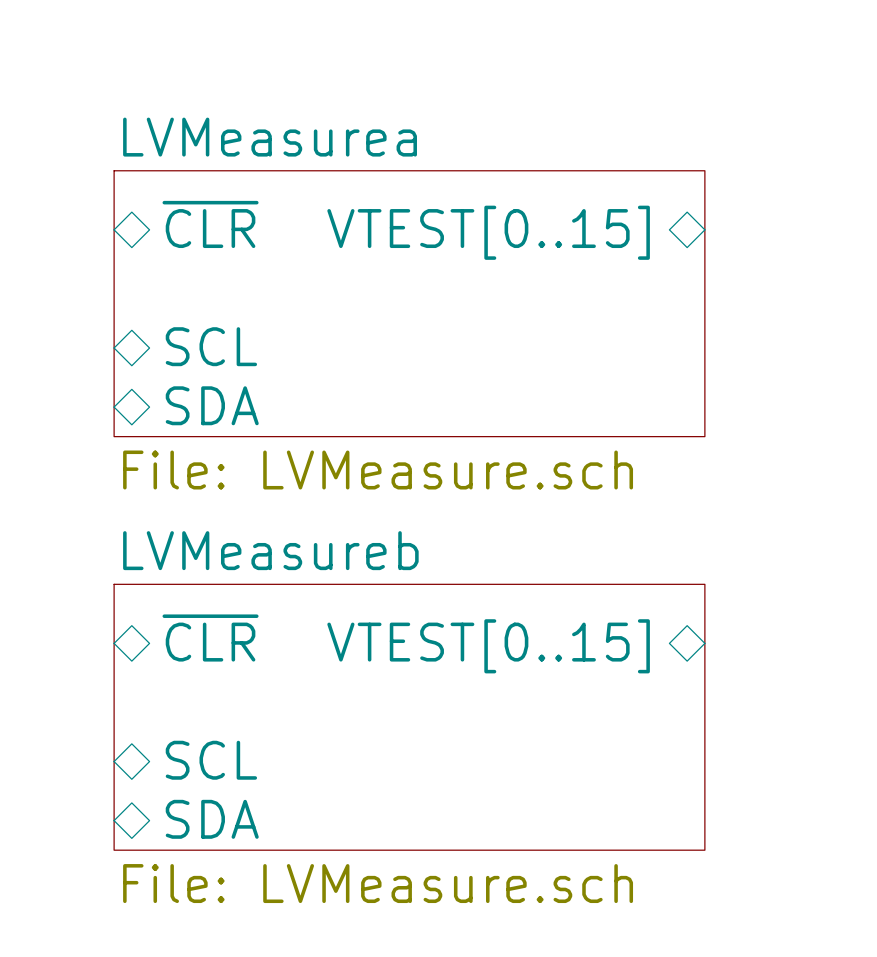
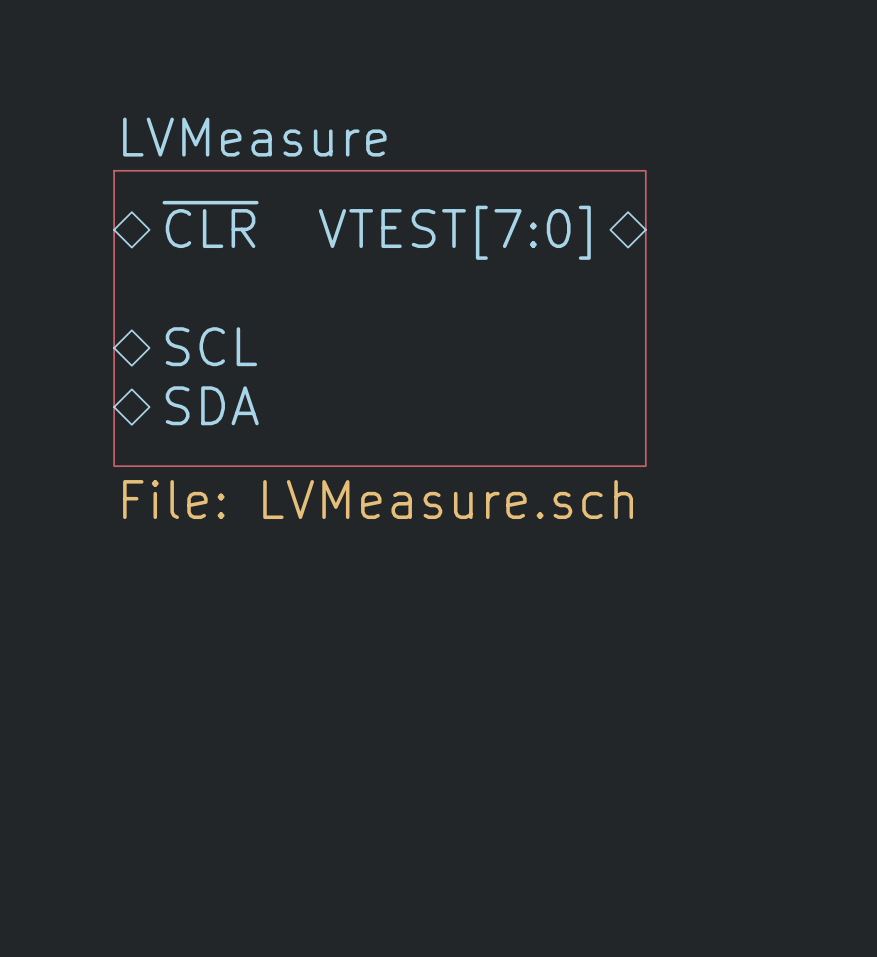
sheet pin: VTEST[0..15] (488, 232) -> VTEST[7:0] (454, 232)
sheet LVMeasurea: File: LVMeasure.sch (409, 303) -> none
sheet LVMeasure: none -> File: LVMeasure.sch (379, 318)
sheet pin: ~{CLR} (210, 638) -> none
sheet pin: VTEST[0..15] (488, 646) -> none
sheet LVMeasureb: File: LVMeasure.sch (409, 717) -> none
sheet pin: SCL (211, 760) -> none
sheet pin: SDA (212, 819) -> none

